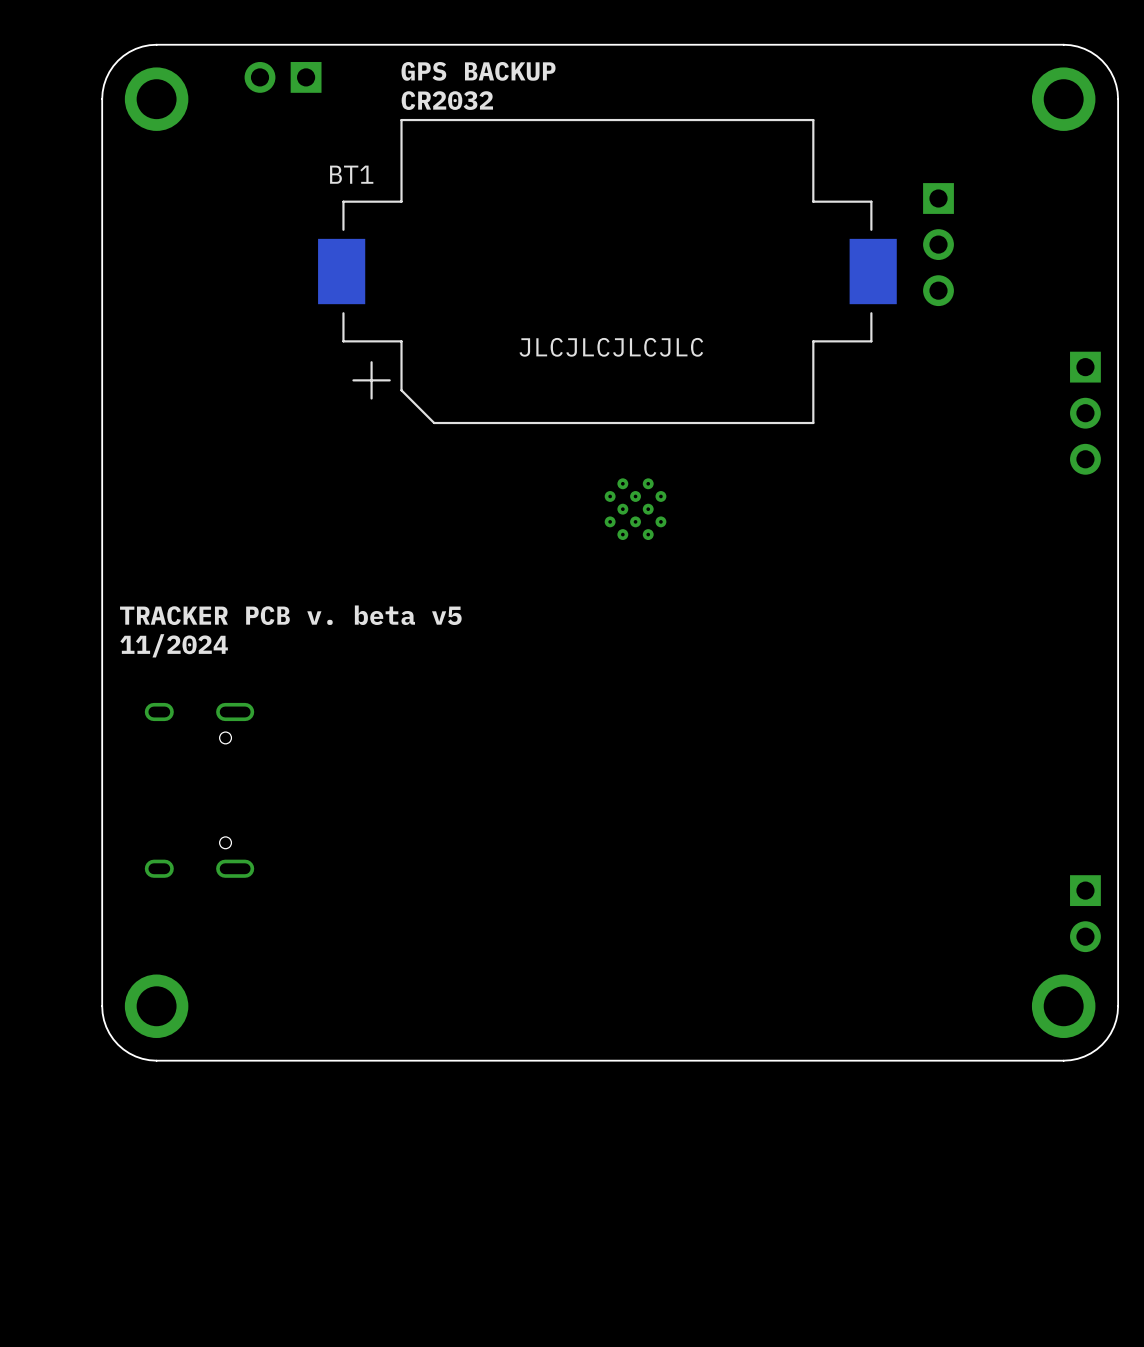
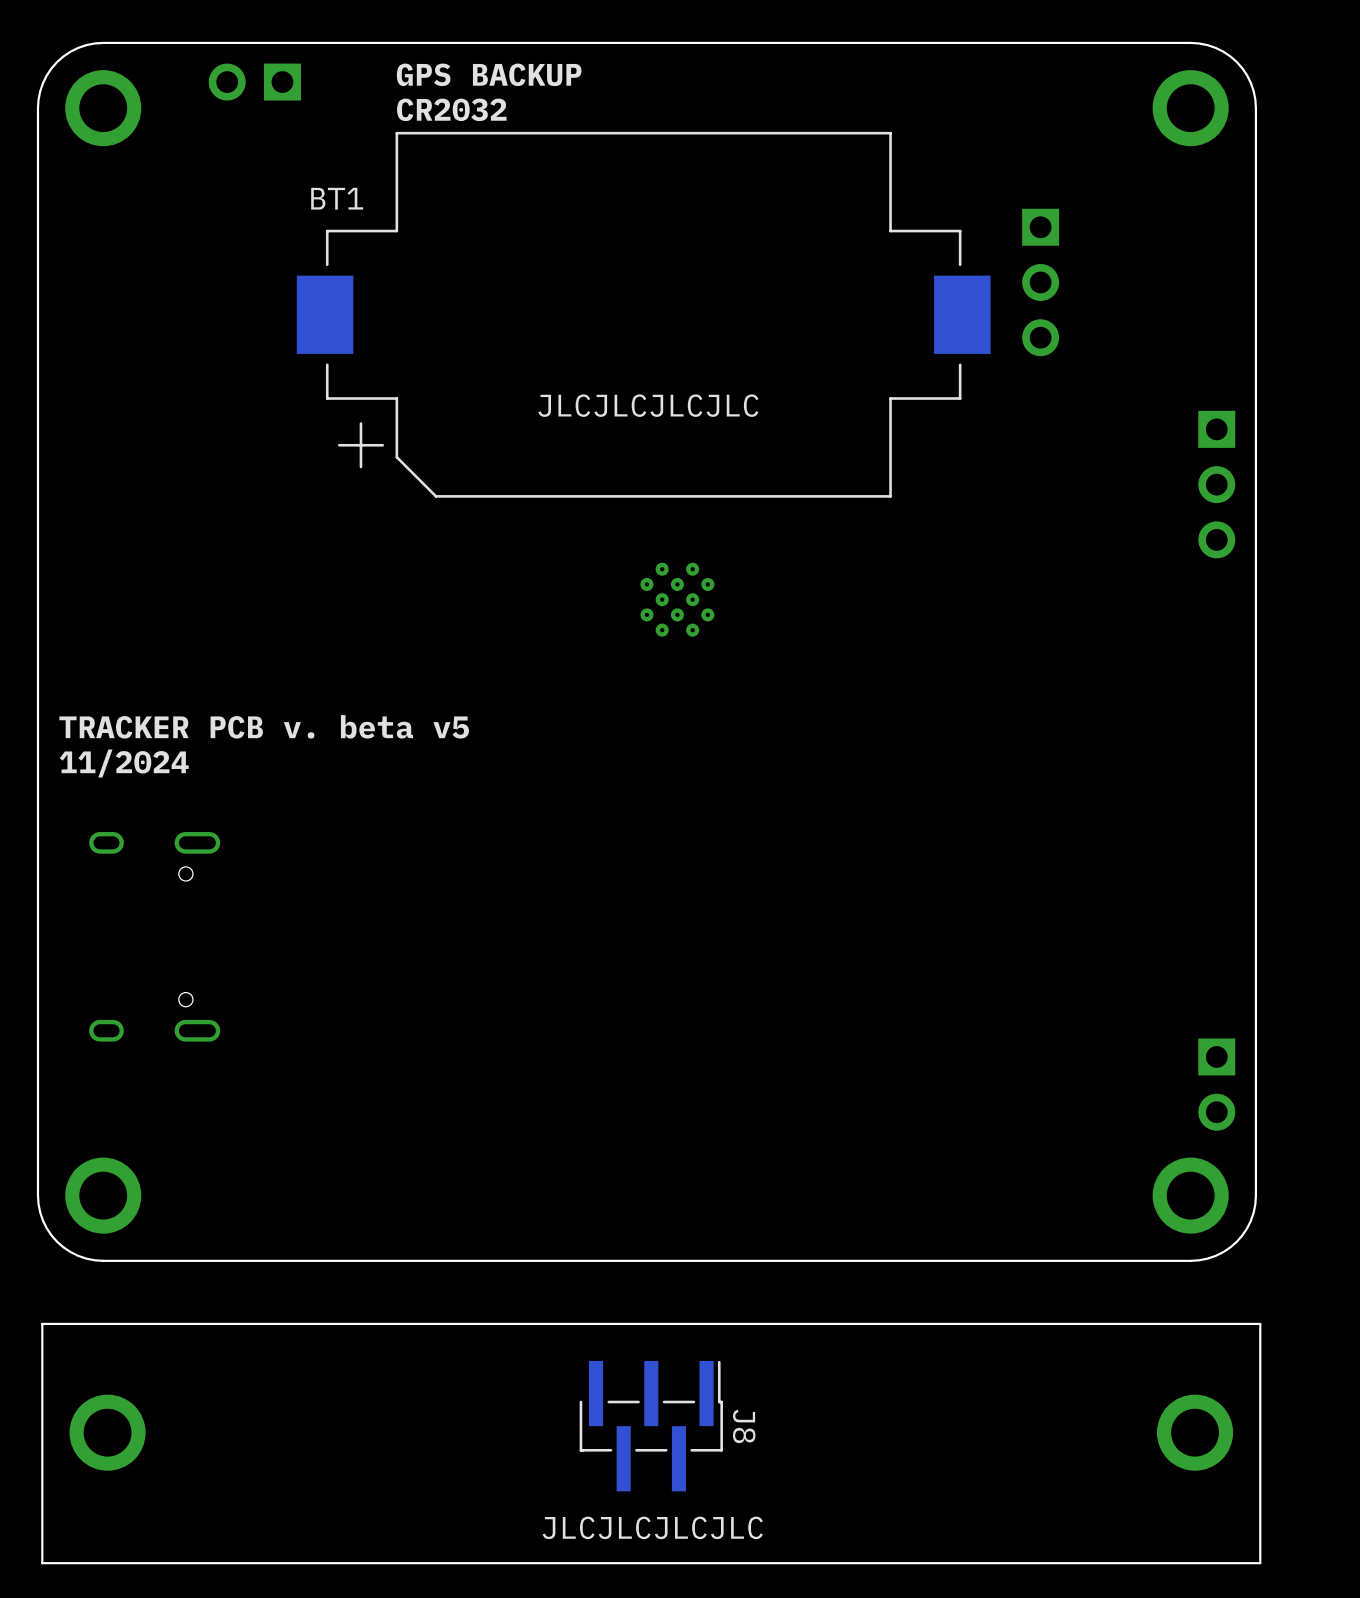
board edge: none -> (1260, 1323) (42, 1323) (42, 1563) (1260, 1563) (1260, 1323)
J8: none -> (651, 1426)
part: none -> (107, 1432)
part: none -> (1195, 1432)
text: none -> JLCJLCJLCJLC (652, 1527)

